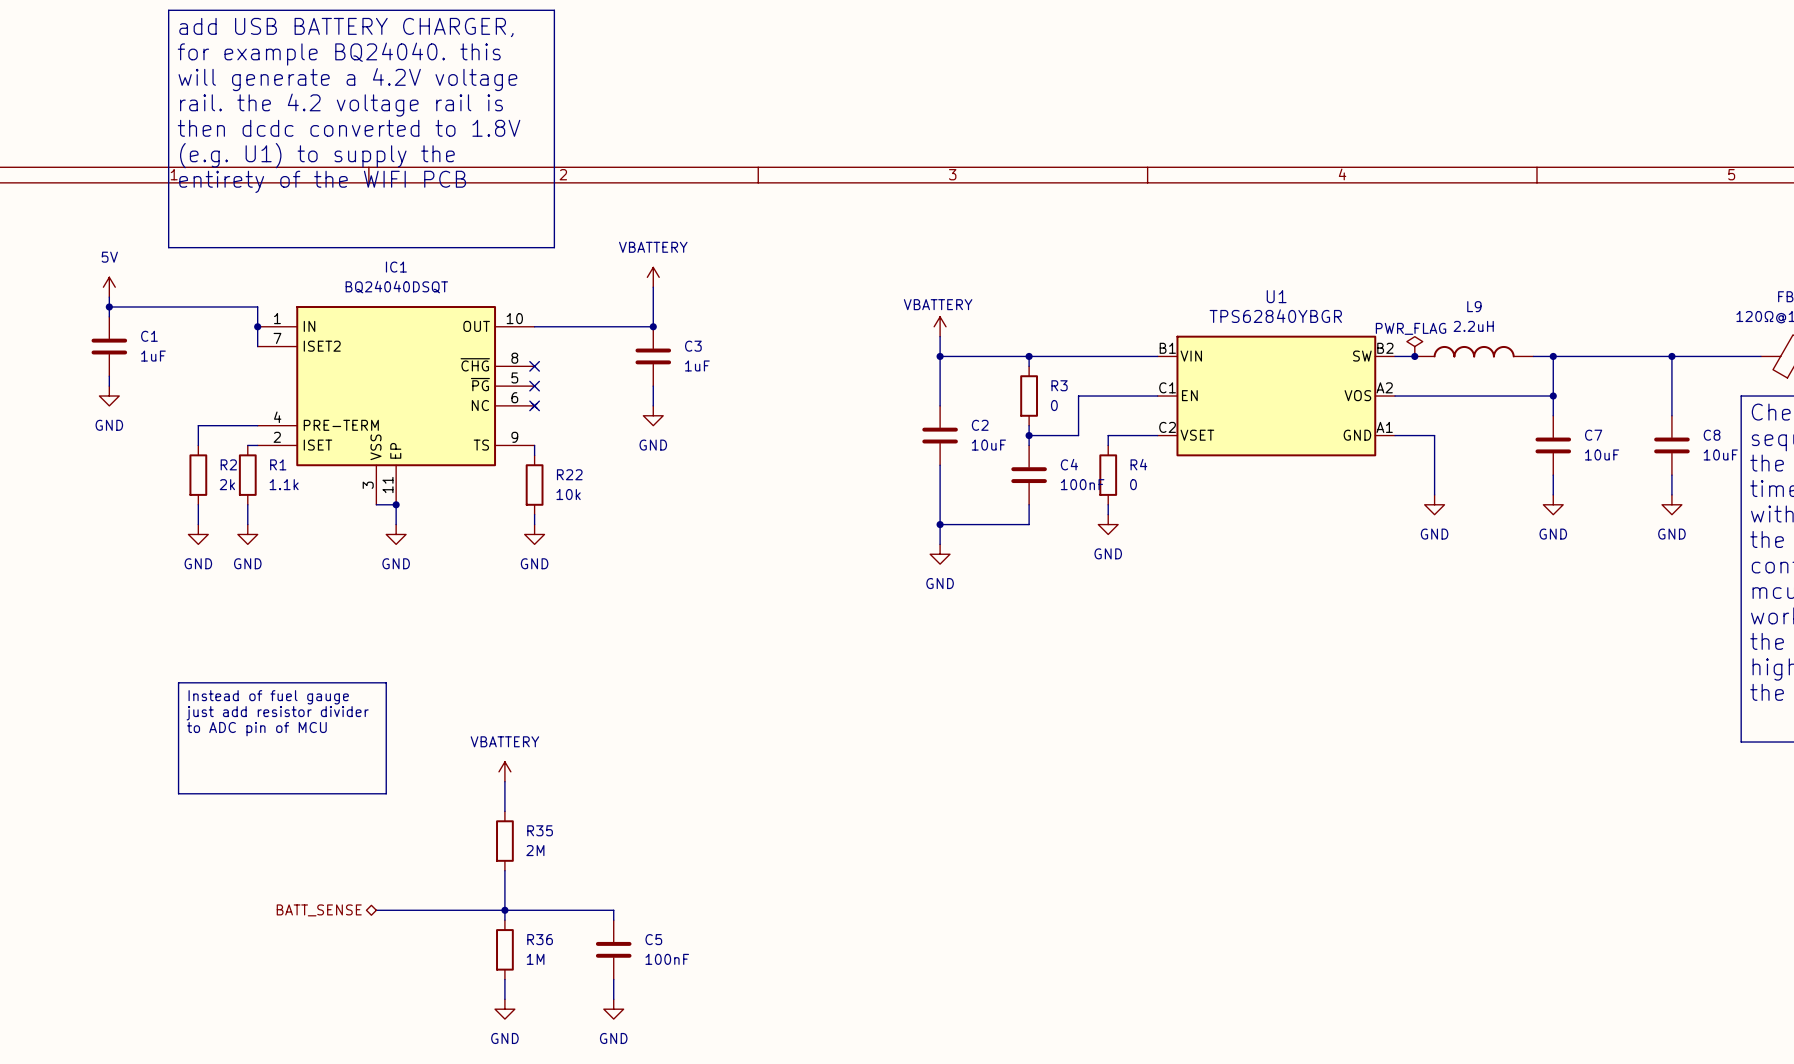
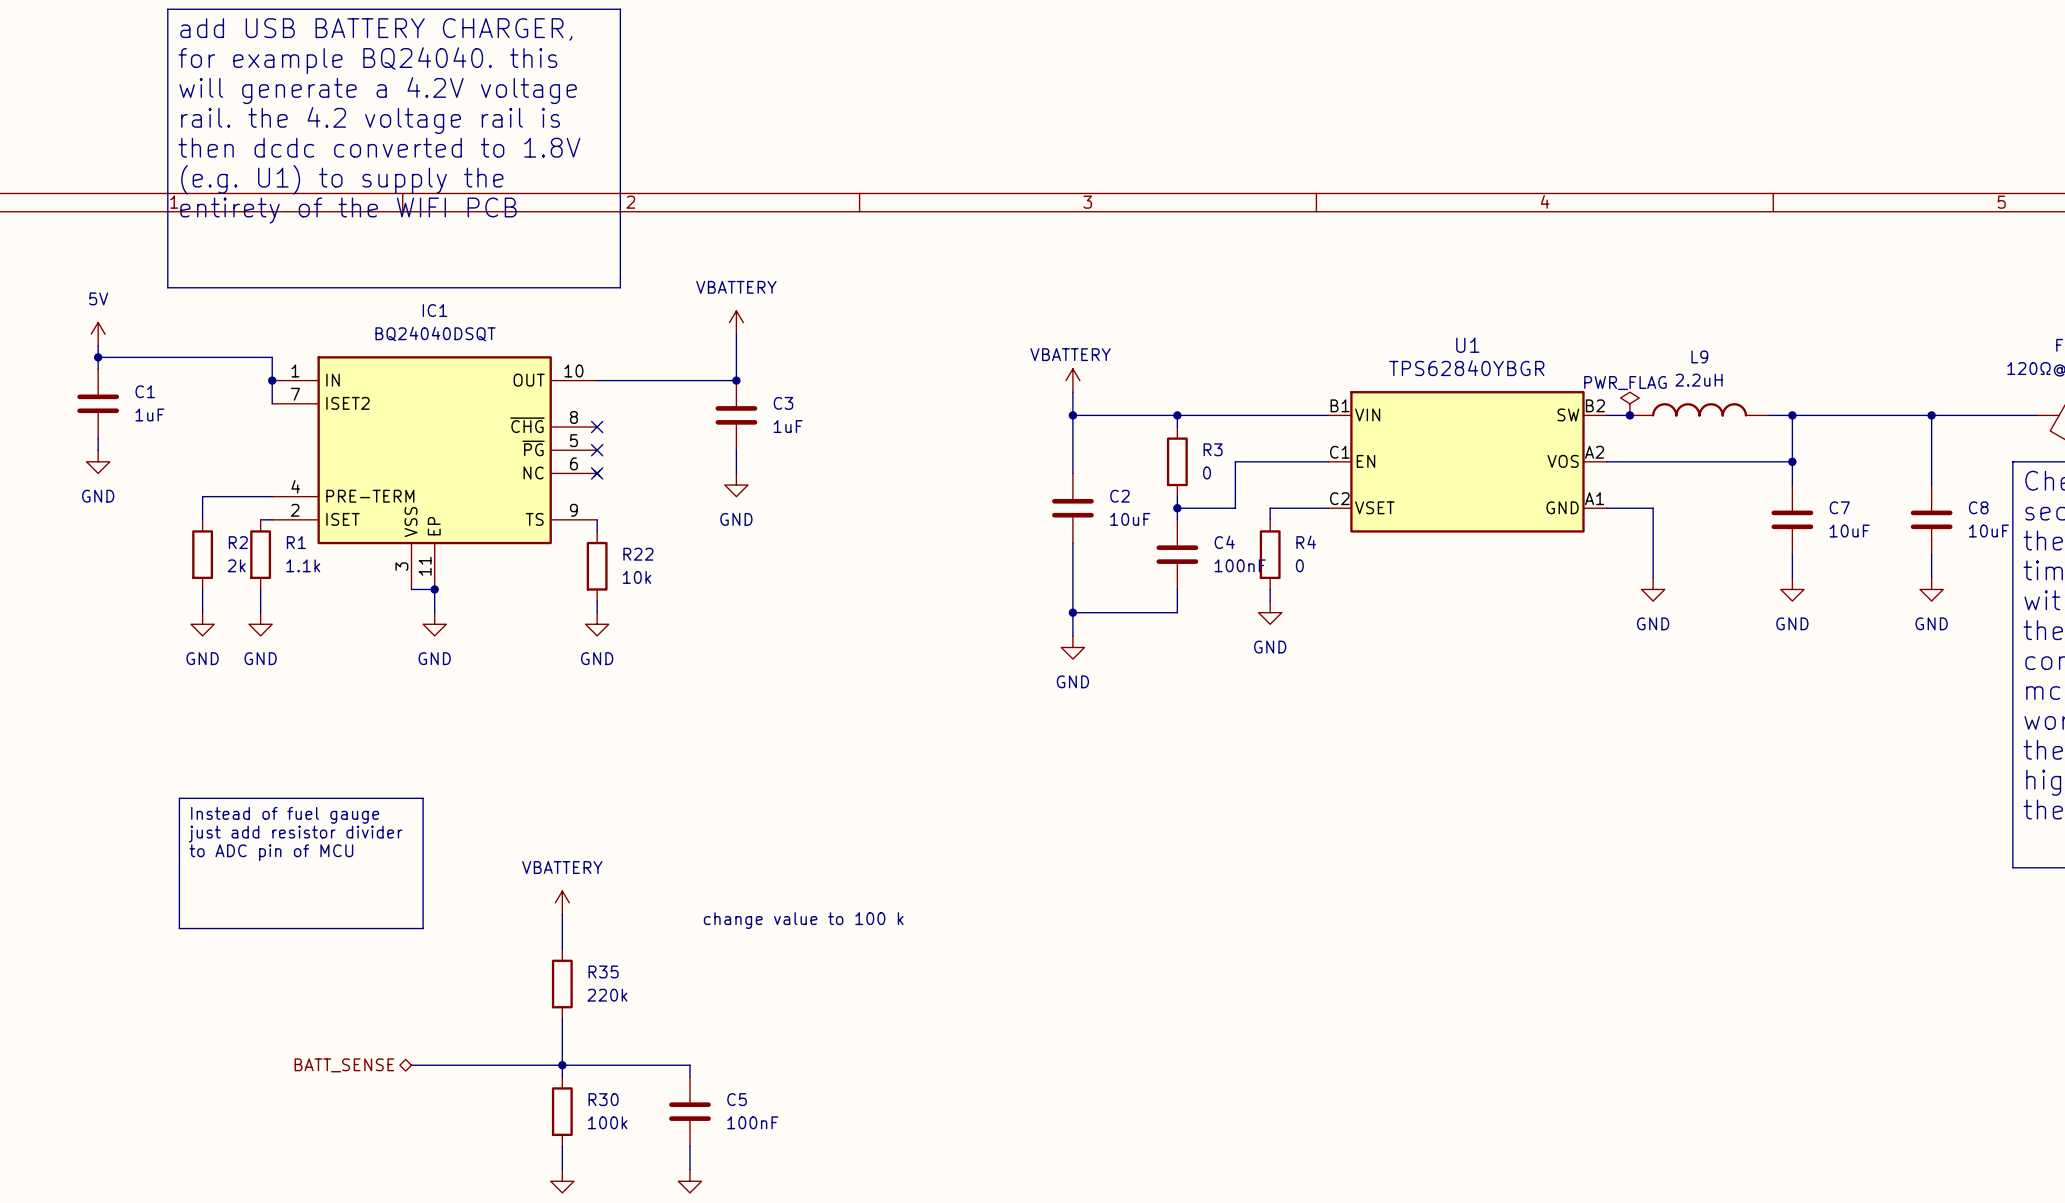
text: none -> change value to 100 k (803, 920)
R35 value: 2M (535, 850) -> 220k (607, 995)
R36 name: R36 (540, 939) -> R30 (603, 1099)
R36 value: 1M (535, 959) -> 100k (607, 1122)

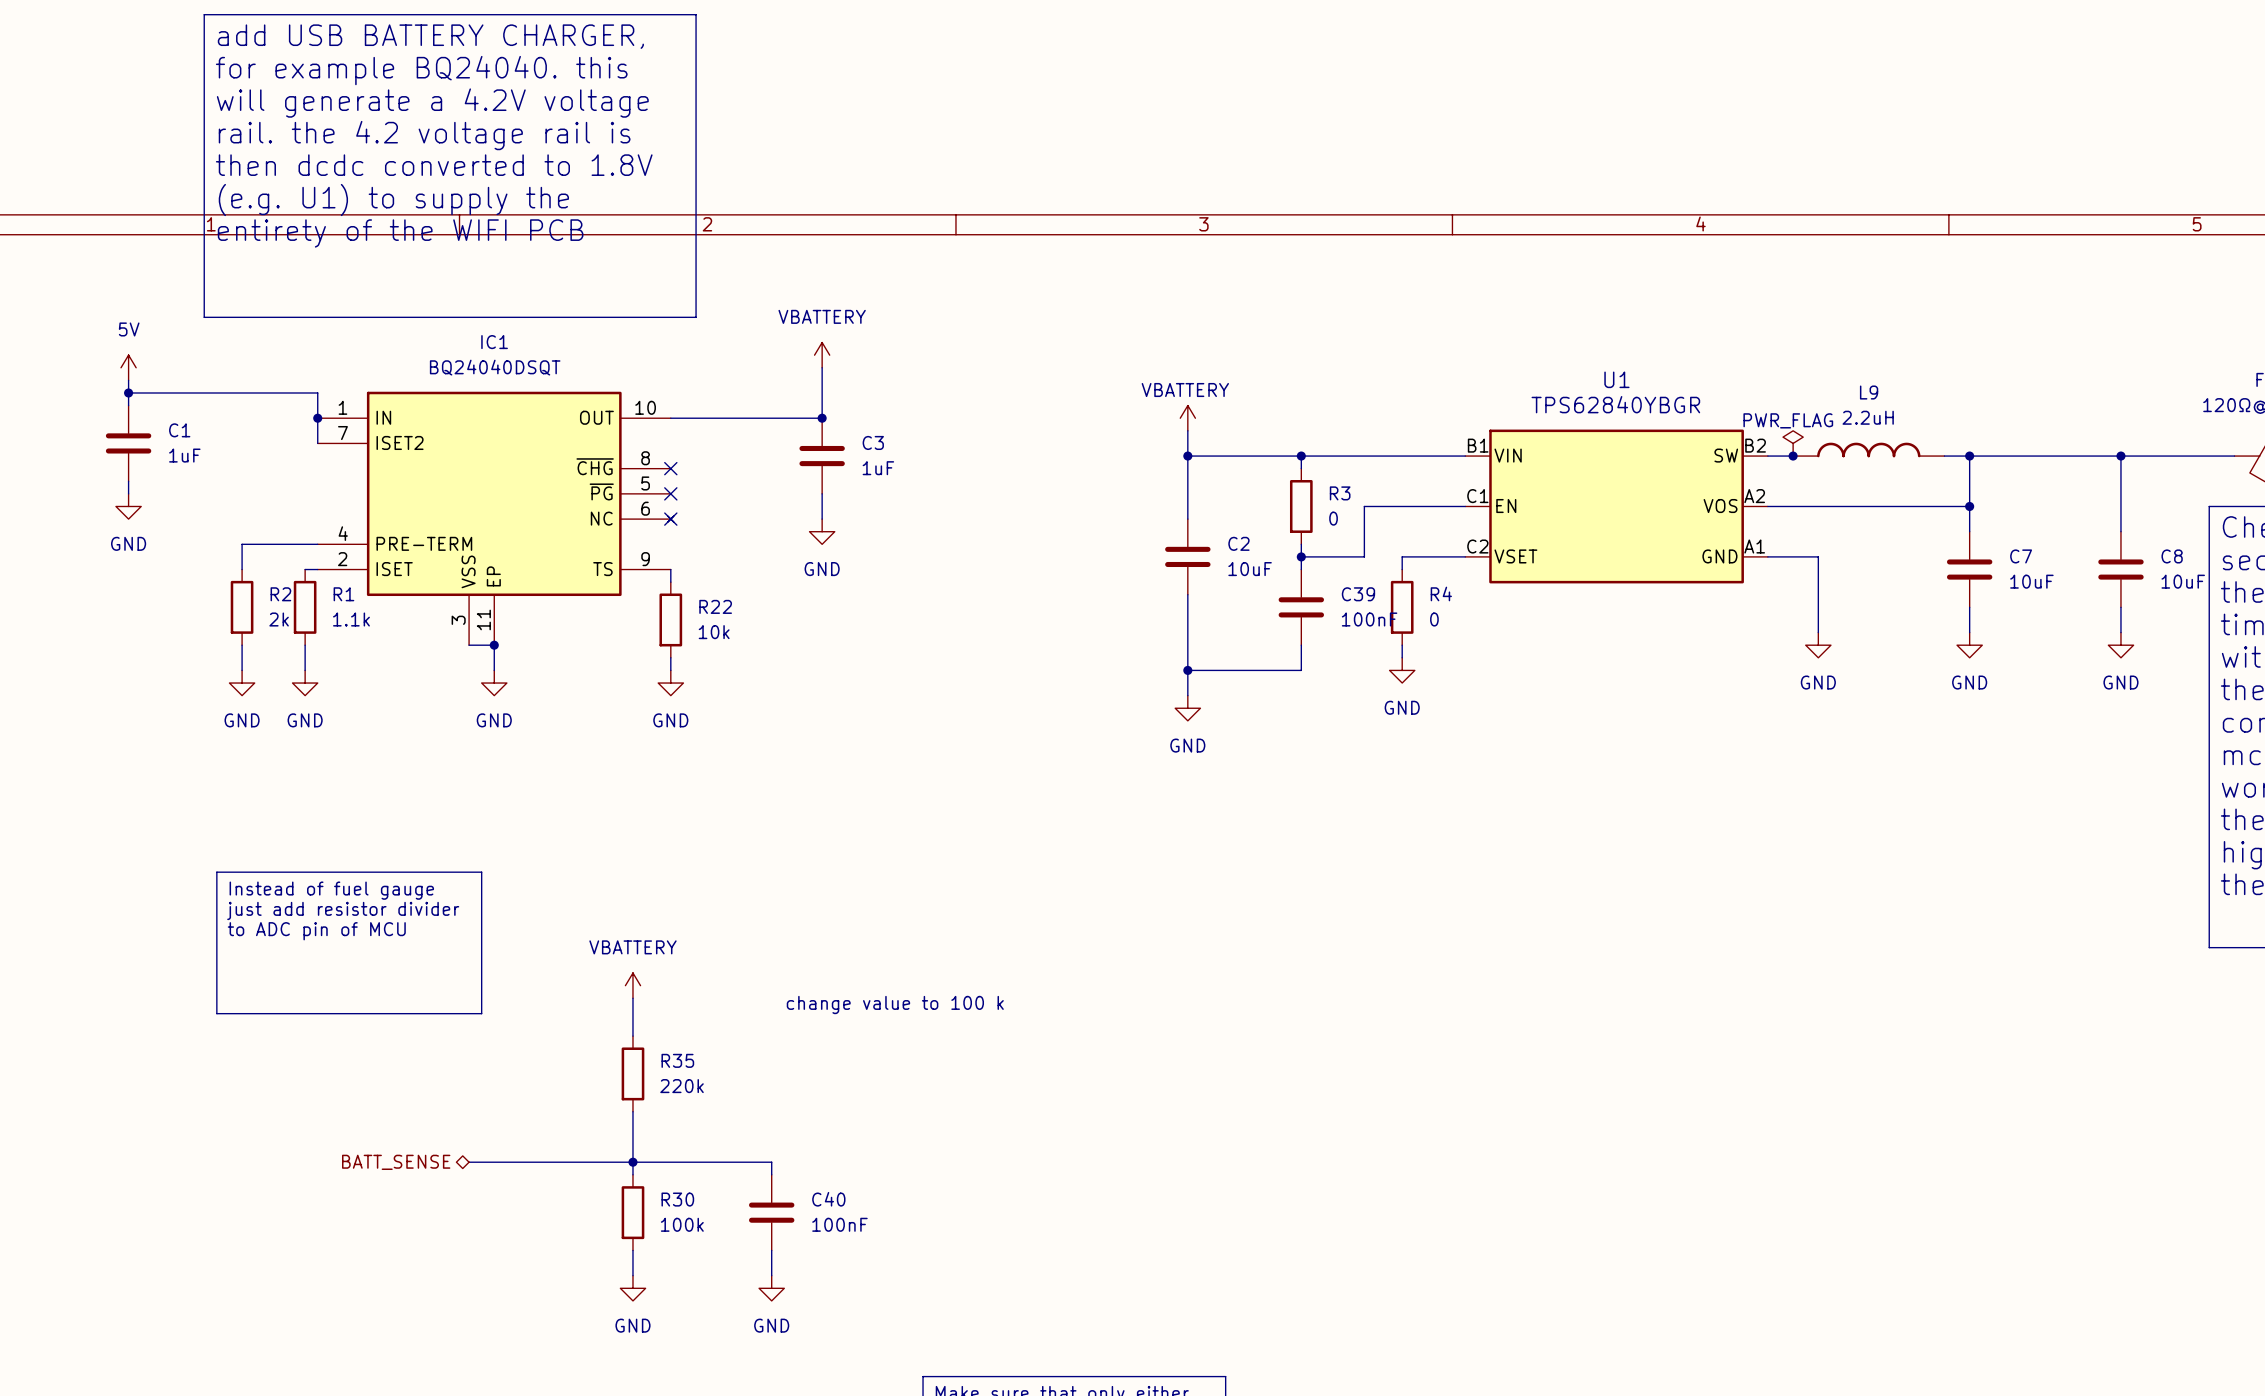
C4 name: C4 (1224, 542) -> C39 (1358, 594)
C5 name: C5 (737, 1099) -> C40 (828, 1199)

